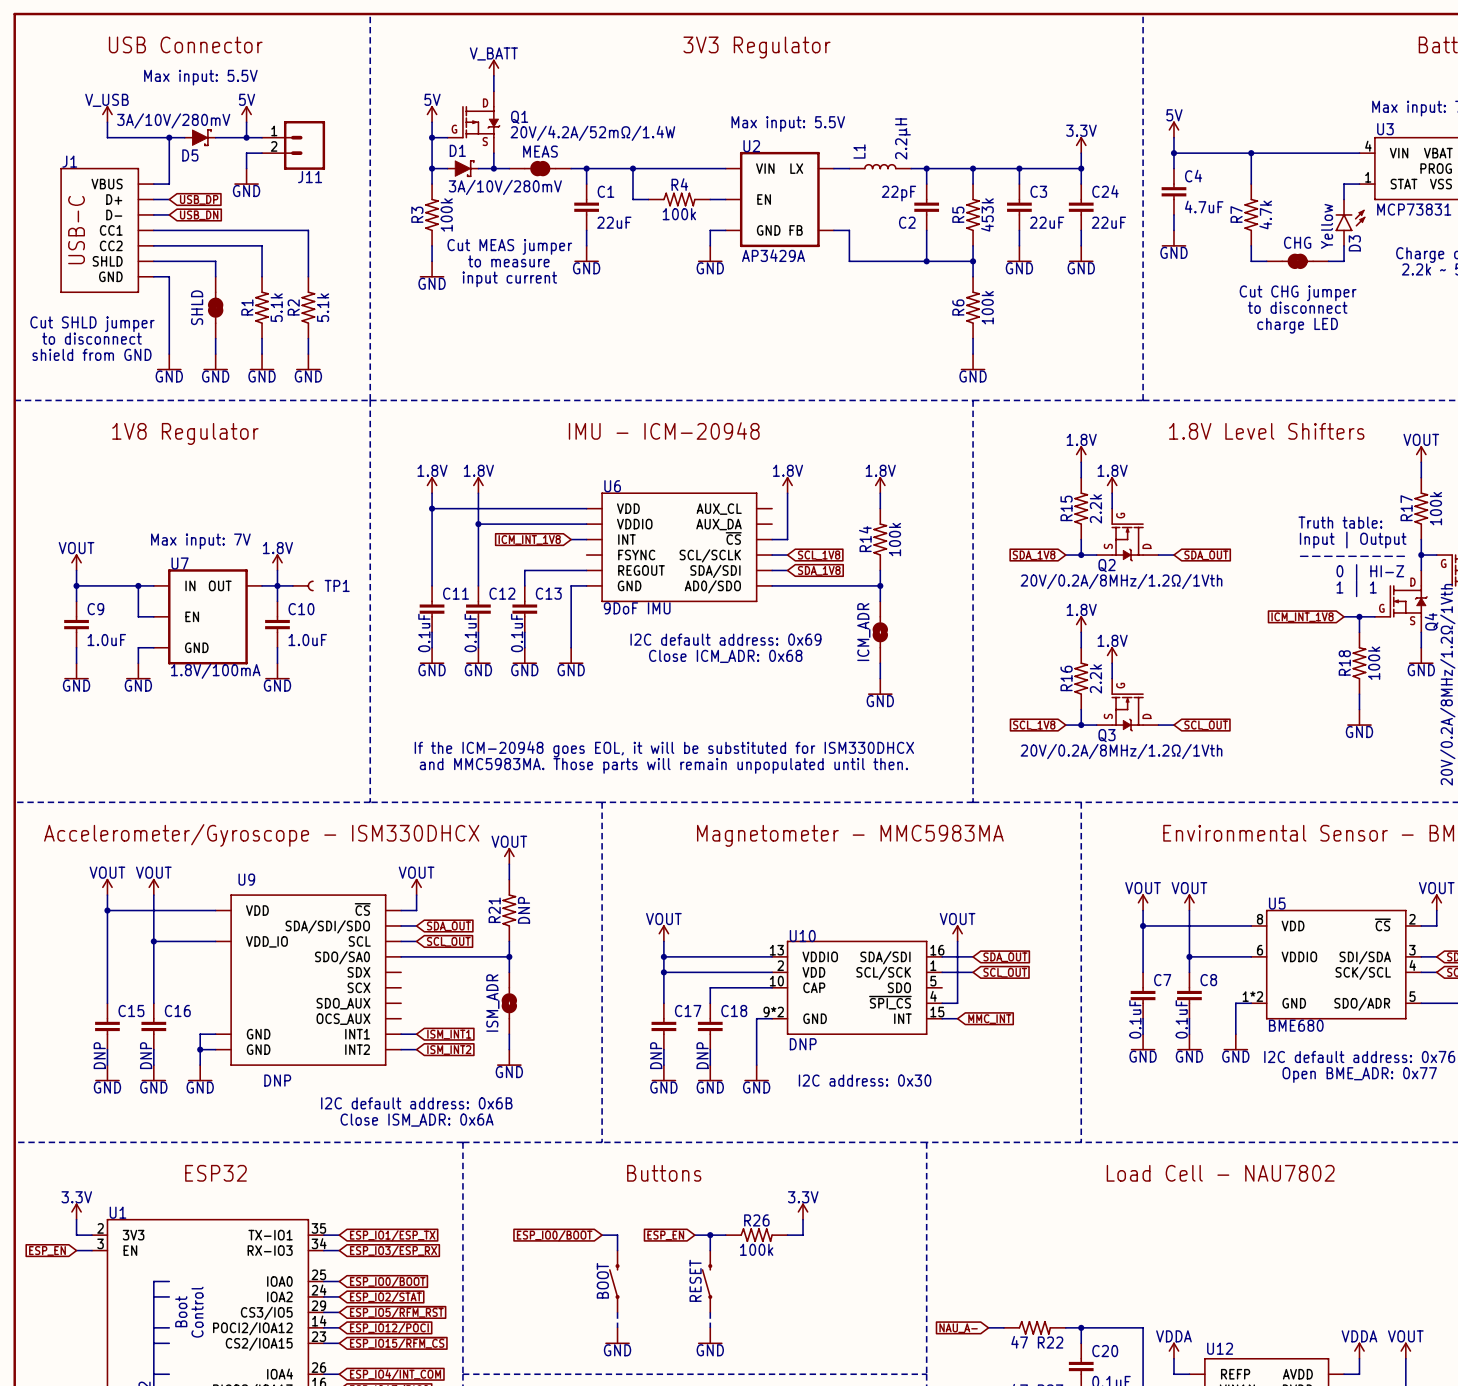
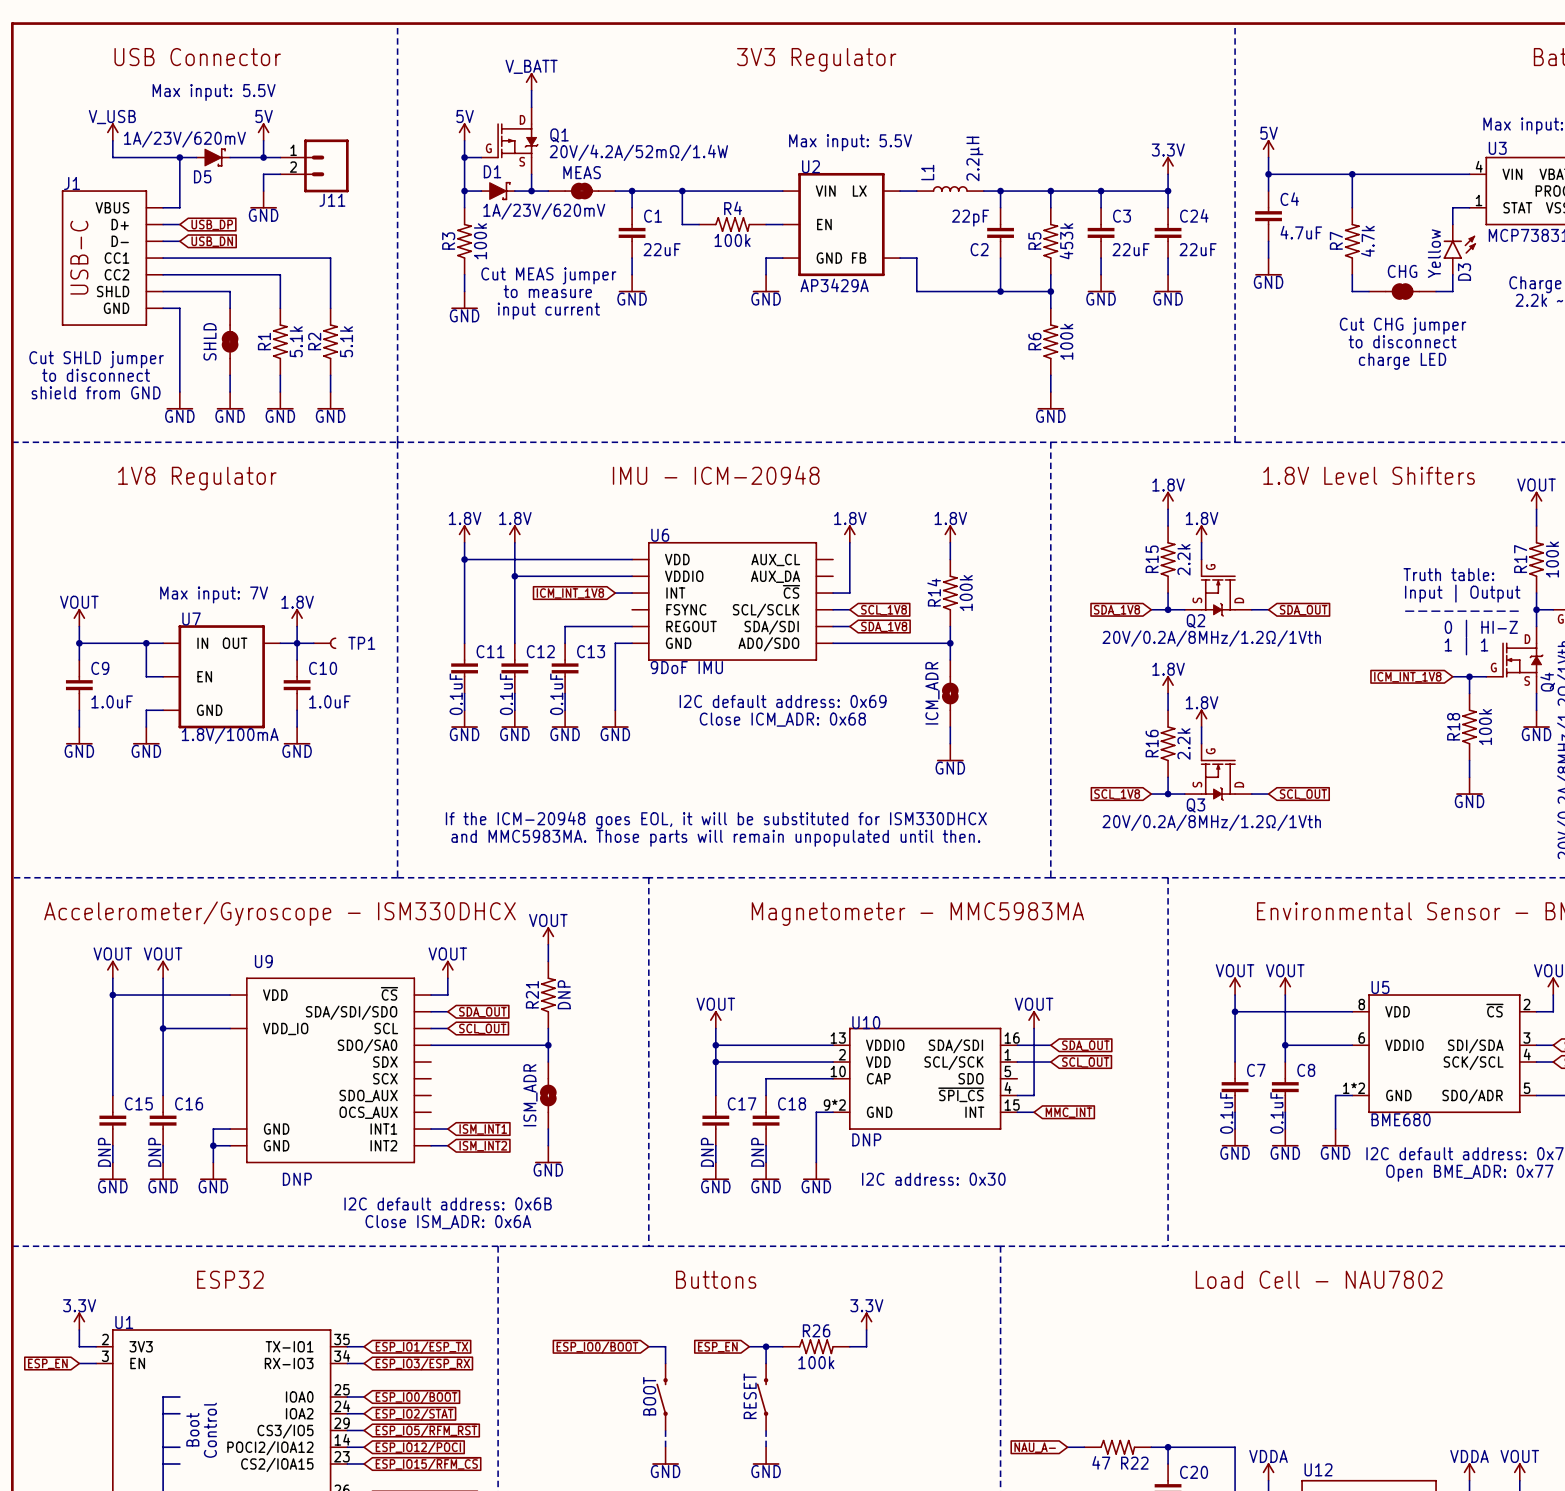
D5 value: 3A/10V/280mV (173, 120) -> 1A/23V/620mV (184, 139)
D1 value: 3A/10V/280mV (505, 187) -> 1A/23V/620mV (544, 211)

